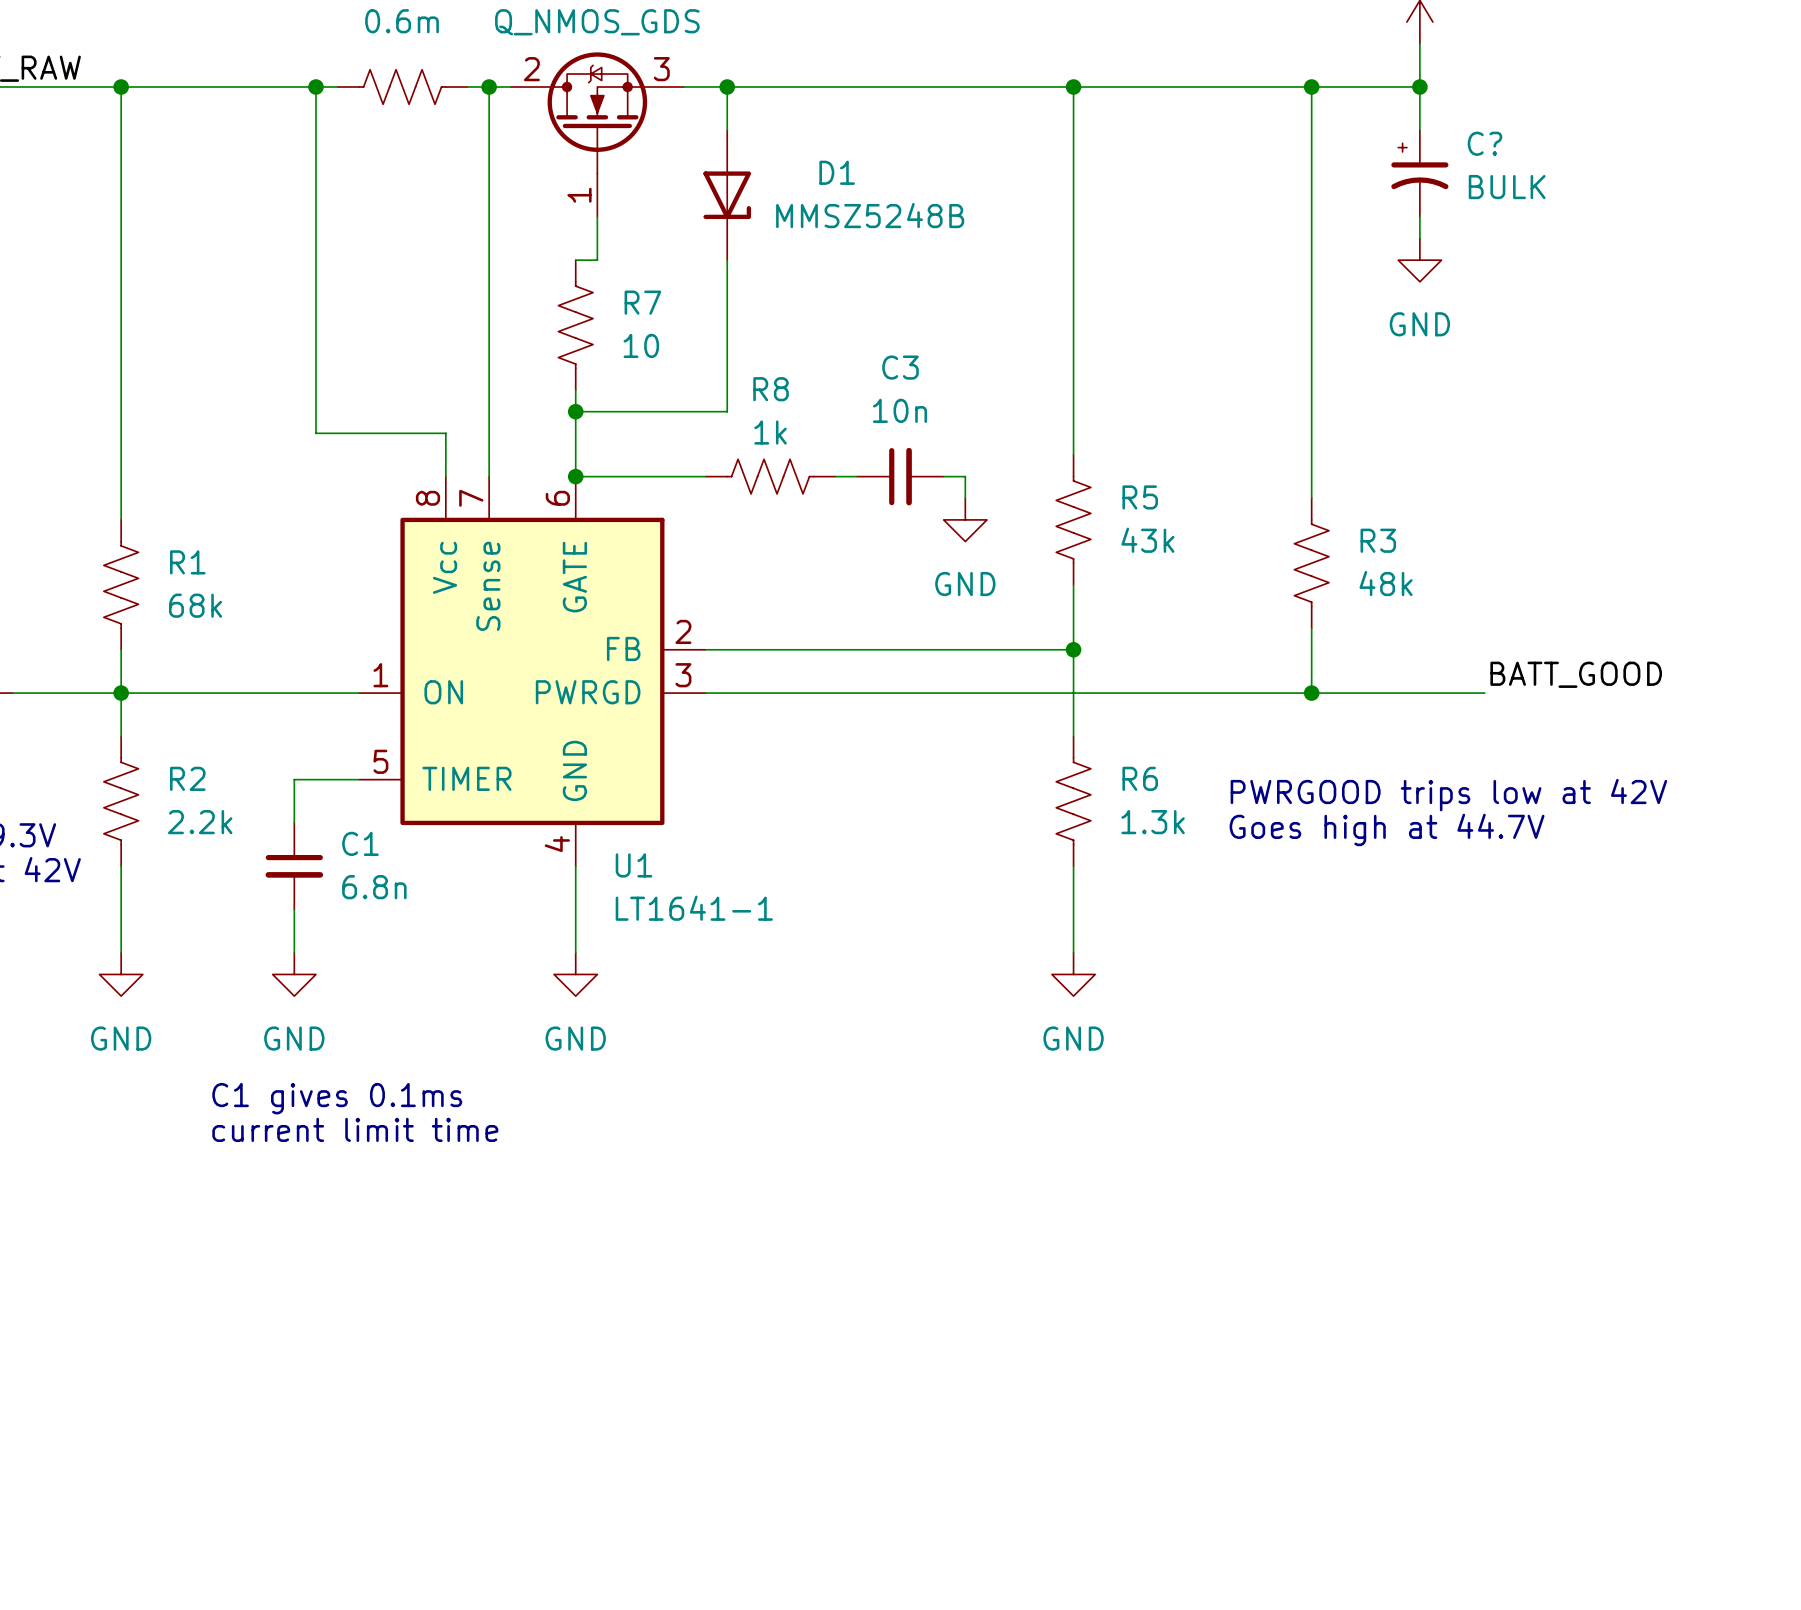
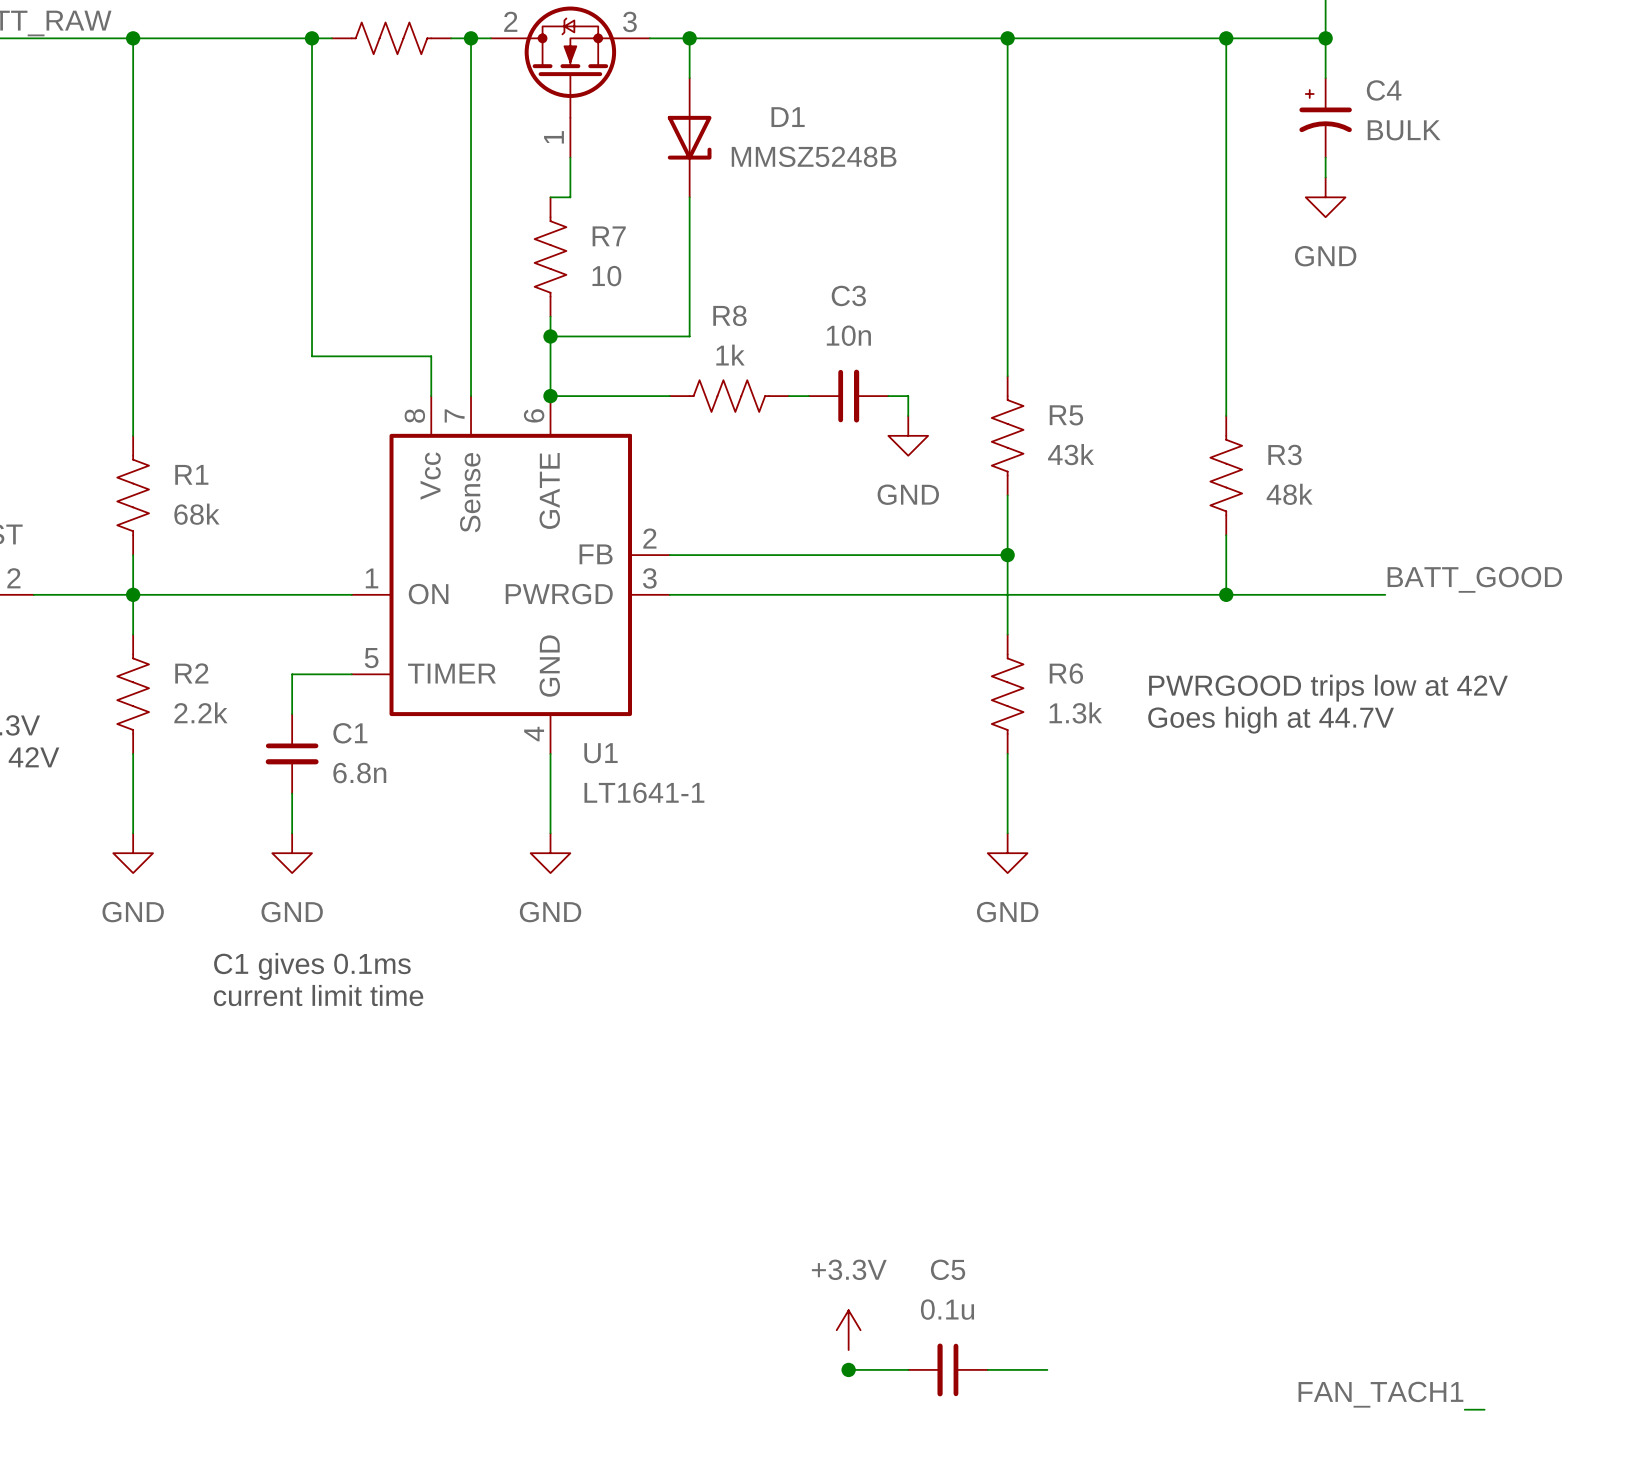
C? name: C? (1484, 143) -> C4 (1384, 90)
power symbol: none -> +3.3V (848, 1330)
wire: none -> (848, 1369) (908, 1369)
junction: none -> (848, 1369)
C5: none -> 0.1u (948, 1369)
wire: none -> (987, 1369) (1047, 1369)
label: none -> FAN_TACH1 (1380, 1394)
wire: none -> (1464, 1409) (1484, 1409)

